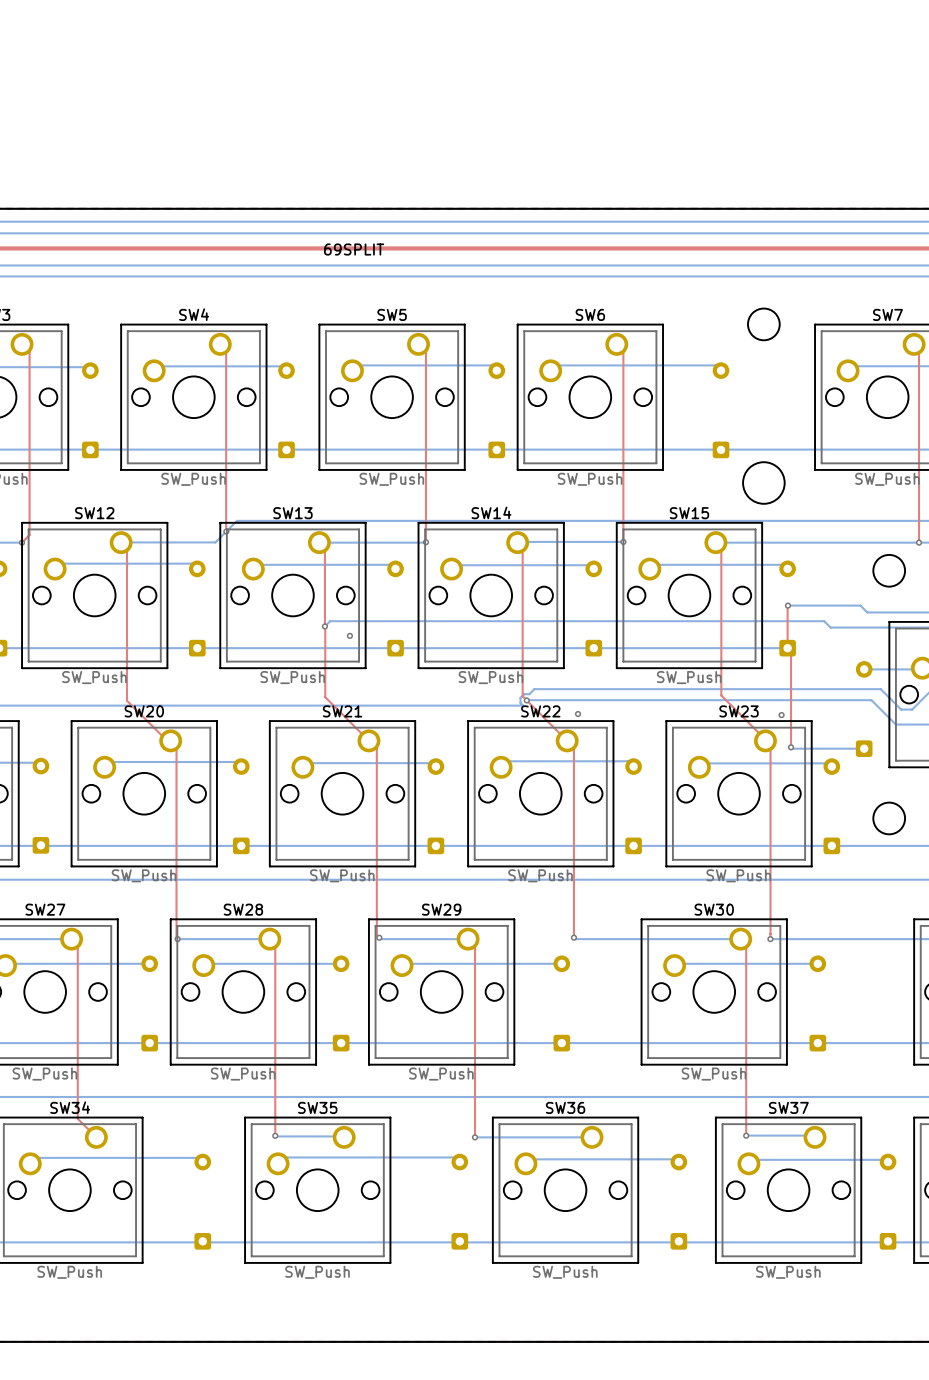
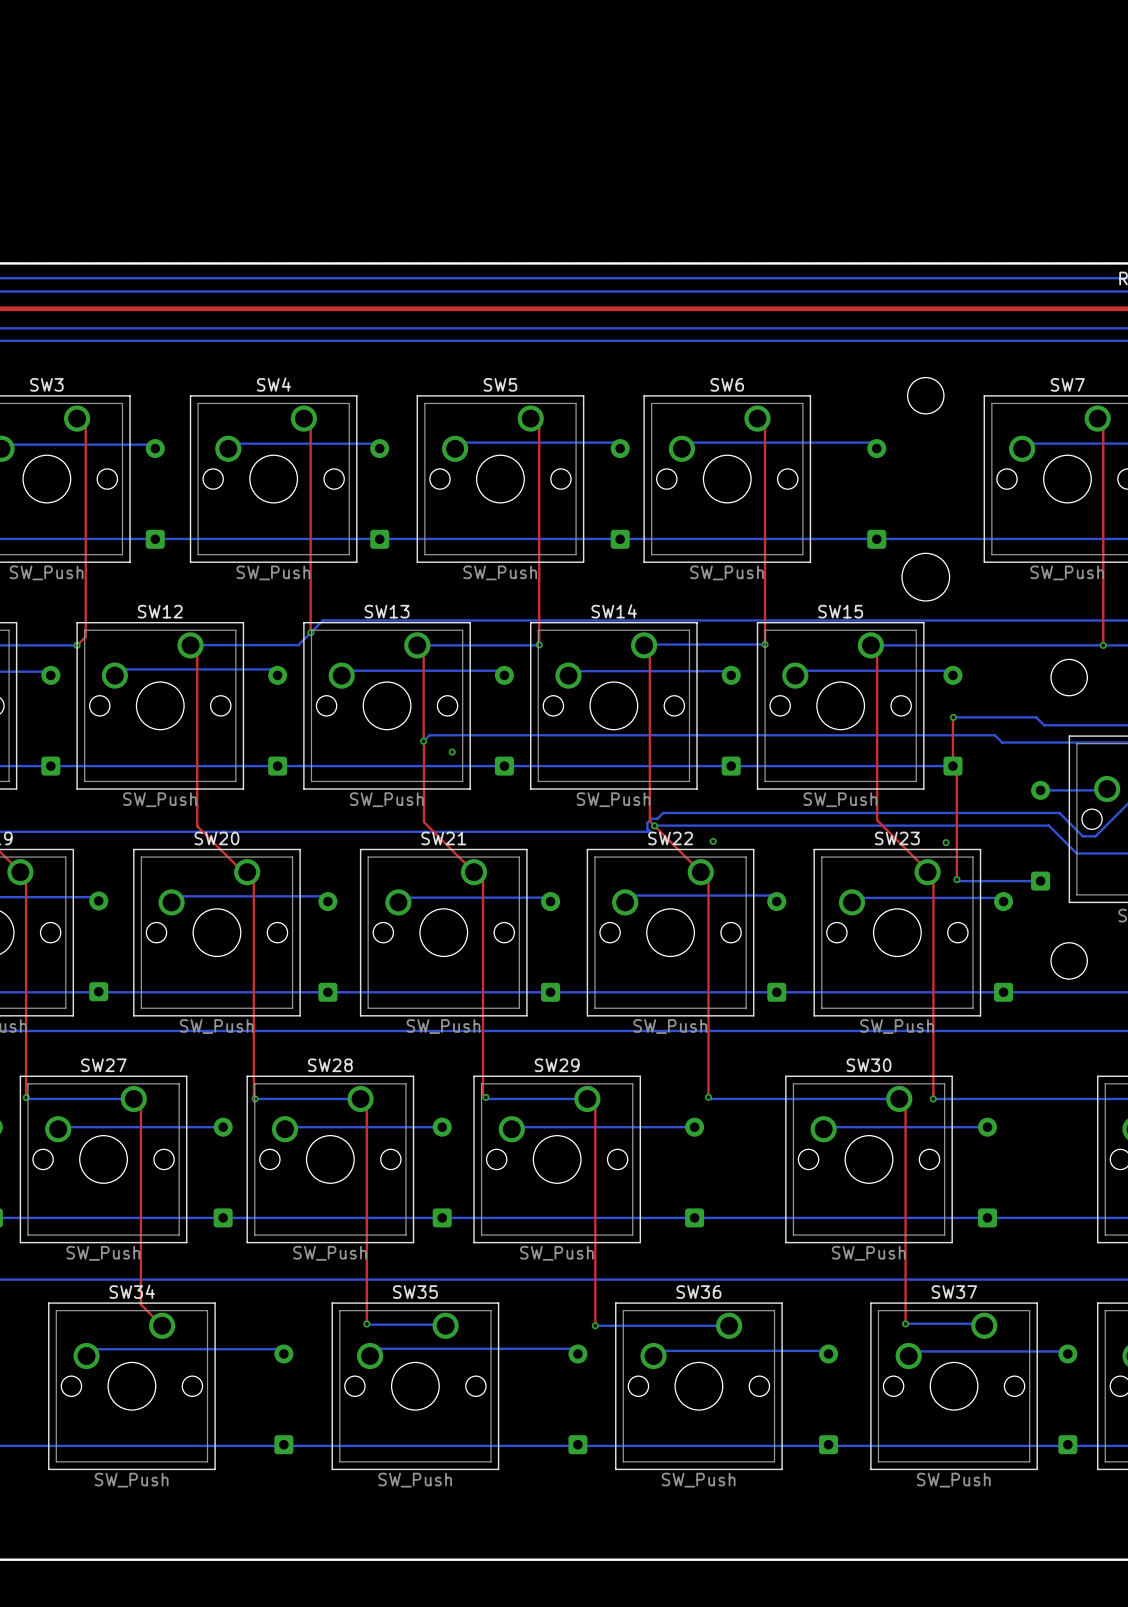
text: 69SPLIT (354, 249) -> none

